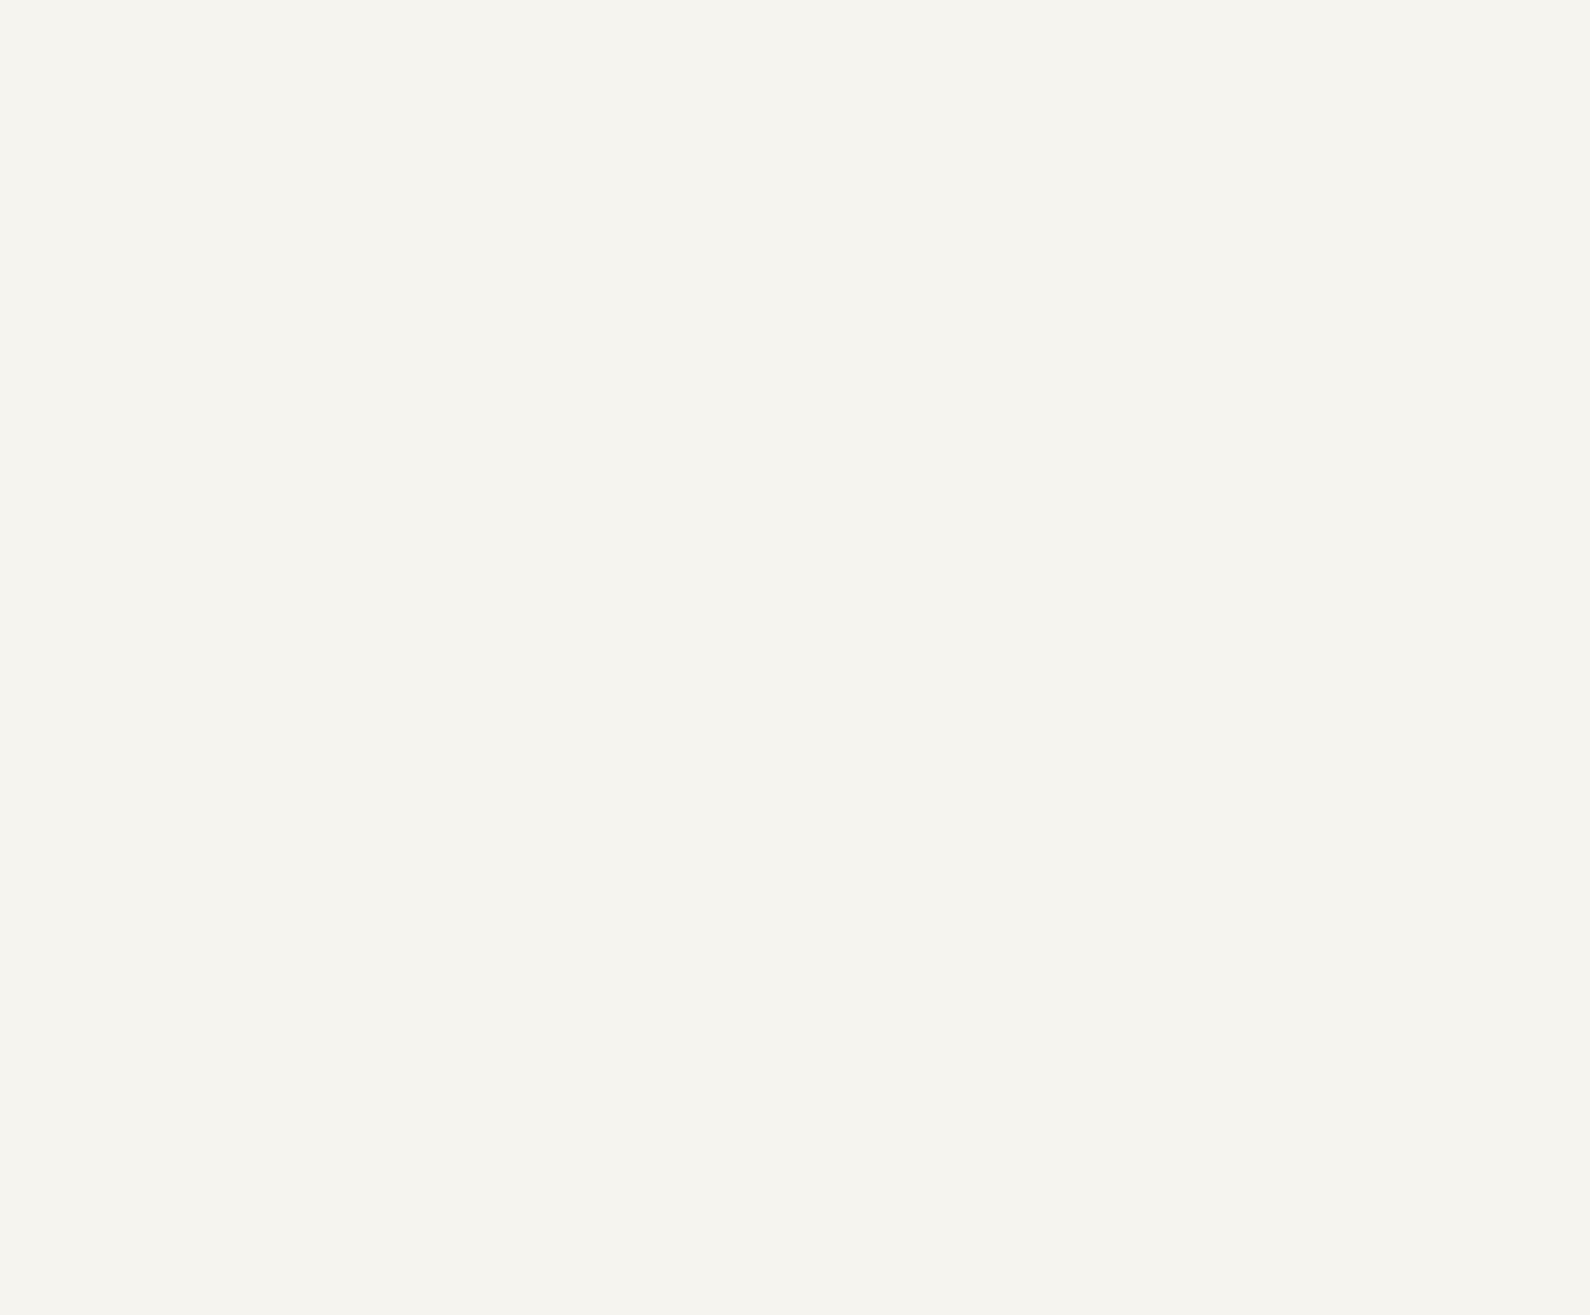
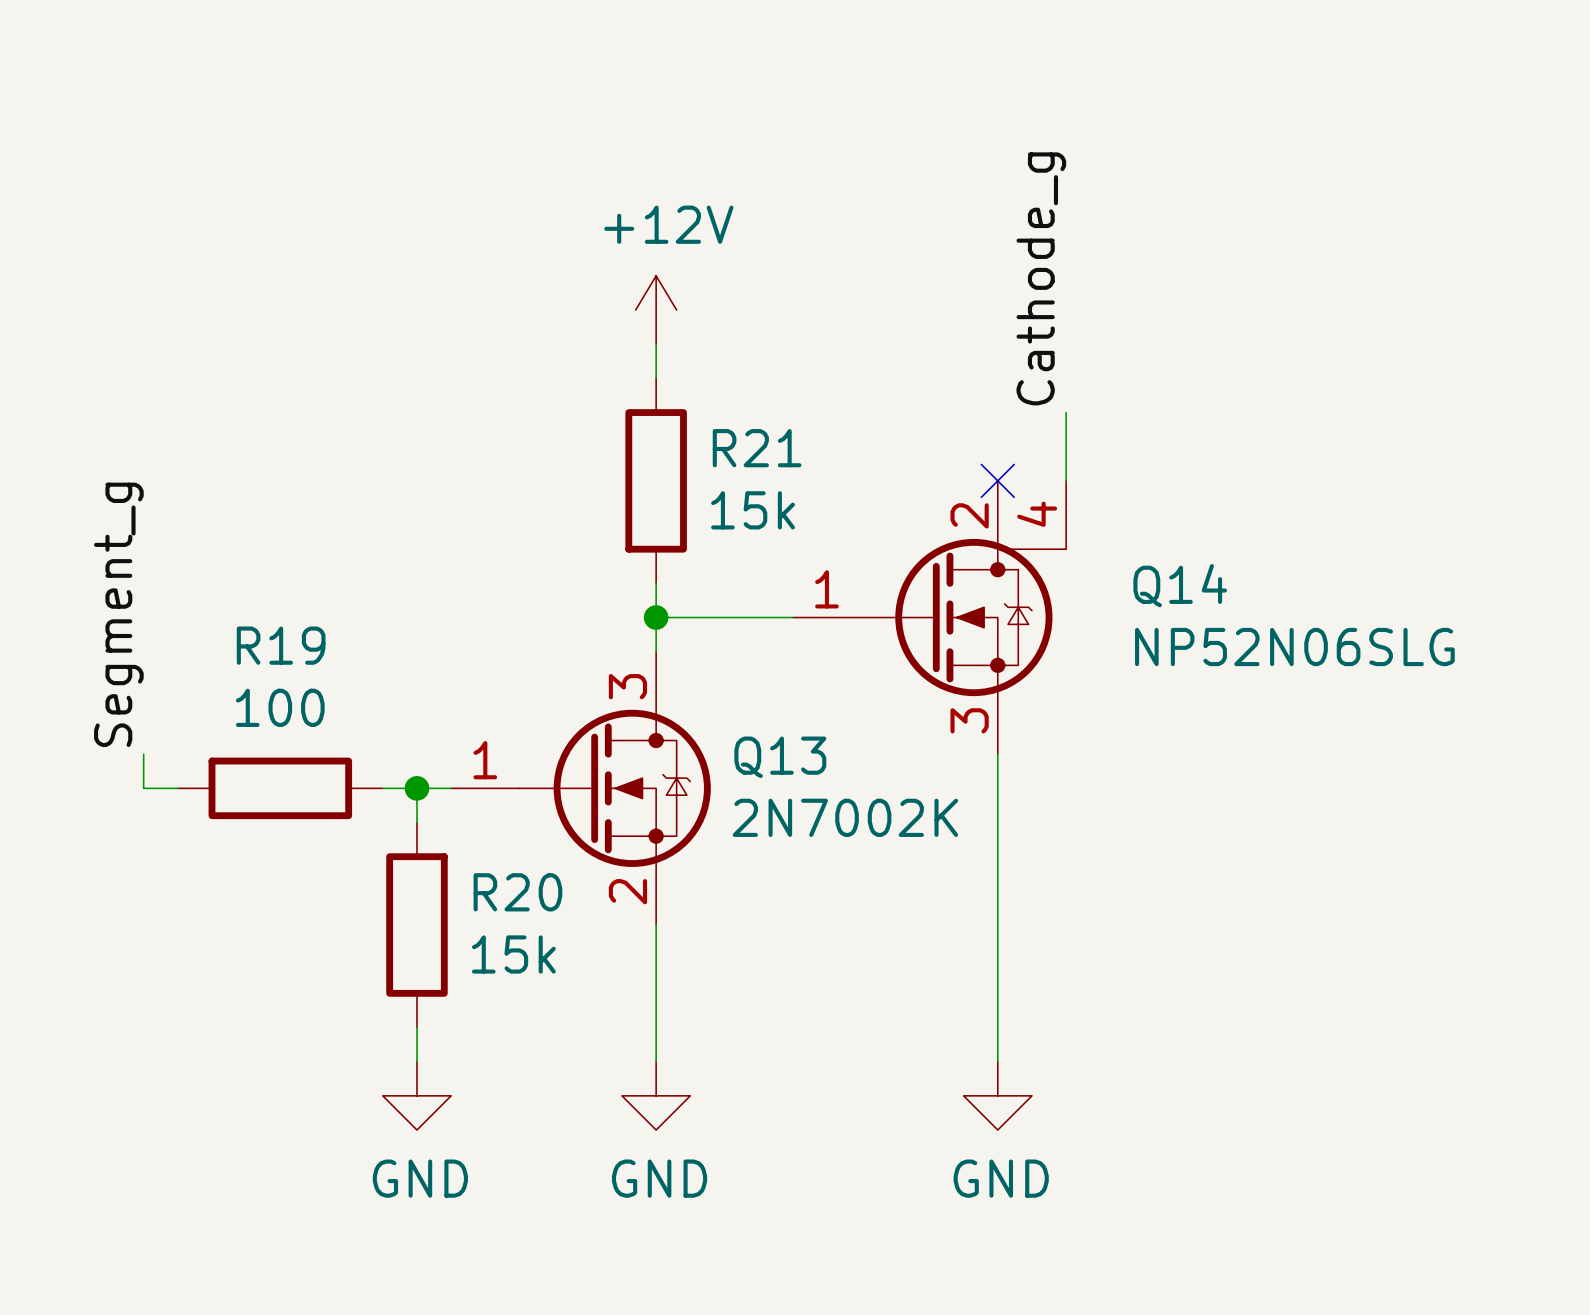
label: none -> Cathode_g (1041, 278)
power symbol: none -> +12V (656, 310)
wire: none -> (656, 344) (656, 378)
wire: none -> (1066, 412) (1066, 480)
R21: none -> 15k (656, 480)
no-connect mark: none -> (997, 480)
wire: none -> (656, 583) (656, 651)
label: none -> Segment_g (118, 614)
wire: none -> (656, 617) (792, 617)
junction: none -> (656, 617)
Q14: none -> NP52N06SLG (929, 617)
wire: none -> (143, 754) (143, 788) (177, 788)
wire: none -> (997, 754) (997, 1061)
R19: none -> 100 (280, 788)
wire: none -> (382, 788) (451, 788)
wire: none -> (416, 788) (416, 822)
junction: none -> (416, 788)
Q13: none -> 2N7002K (580, 788)
R20: none -> 15k (416, 925)
wire: none -> (656, 925) (656, 1061)
wire: none -> (416, 1027) (416, 1061)
power symbol: none -> GND (416, 1095)
power symbol: none -> GND (656, 1095)
power symbol: none -> GND (997, 1095)

